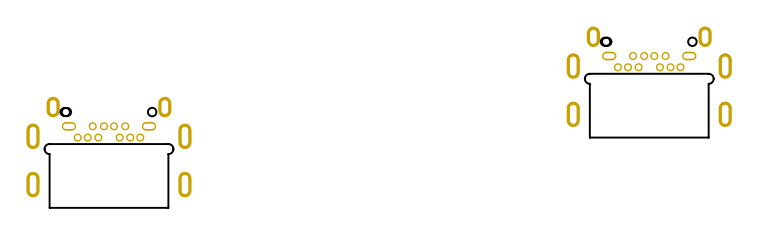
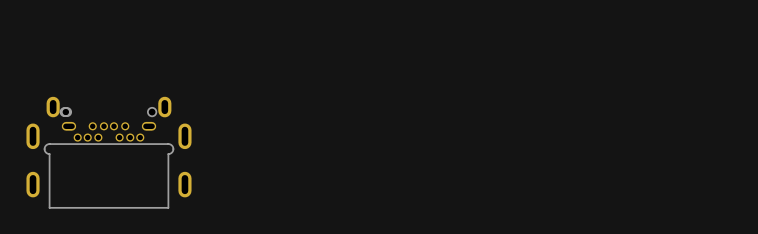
part: (649, 82) -> none

